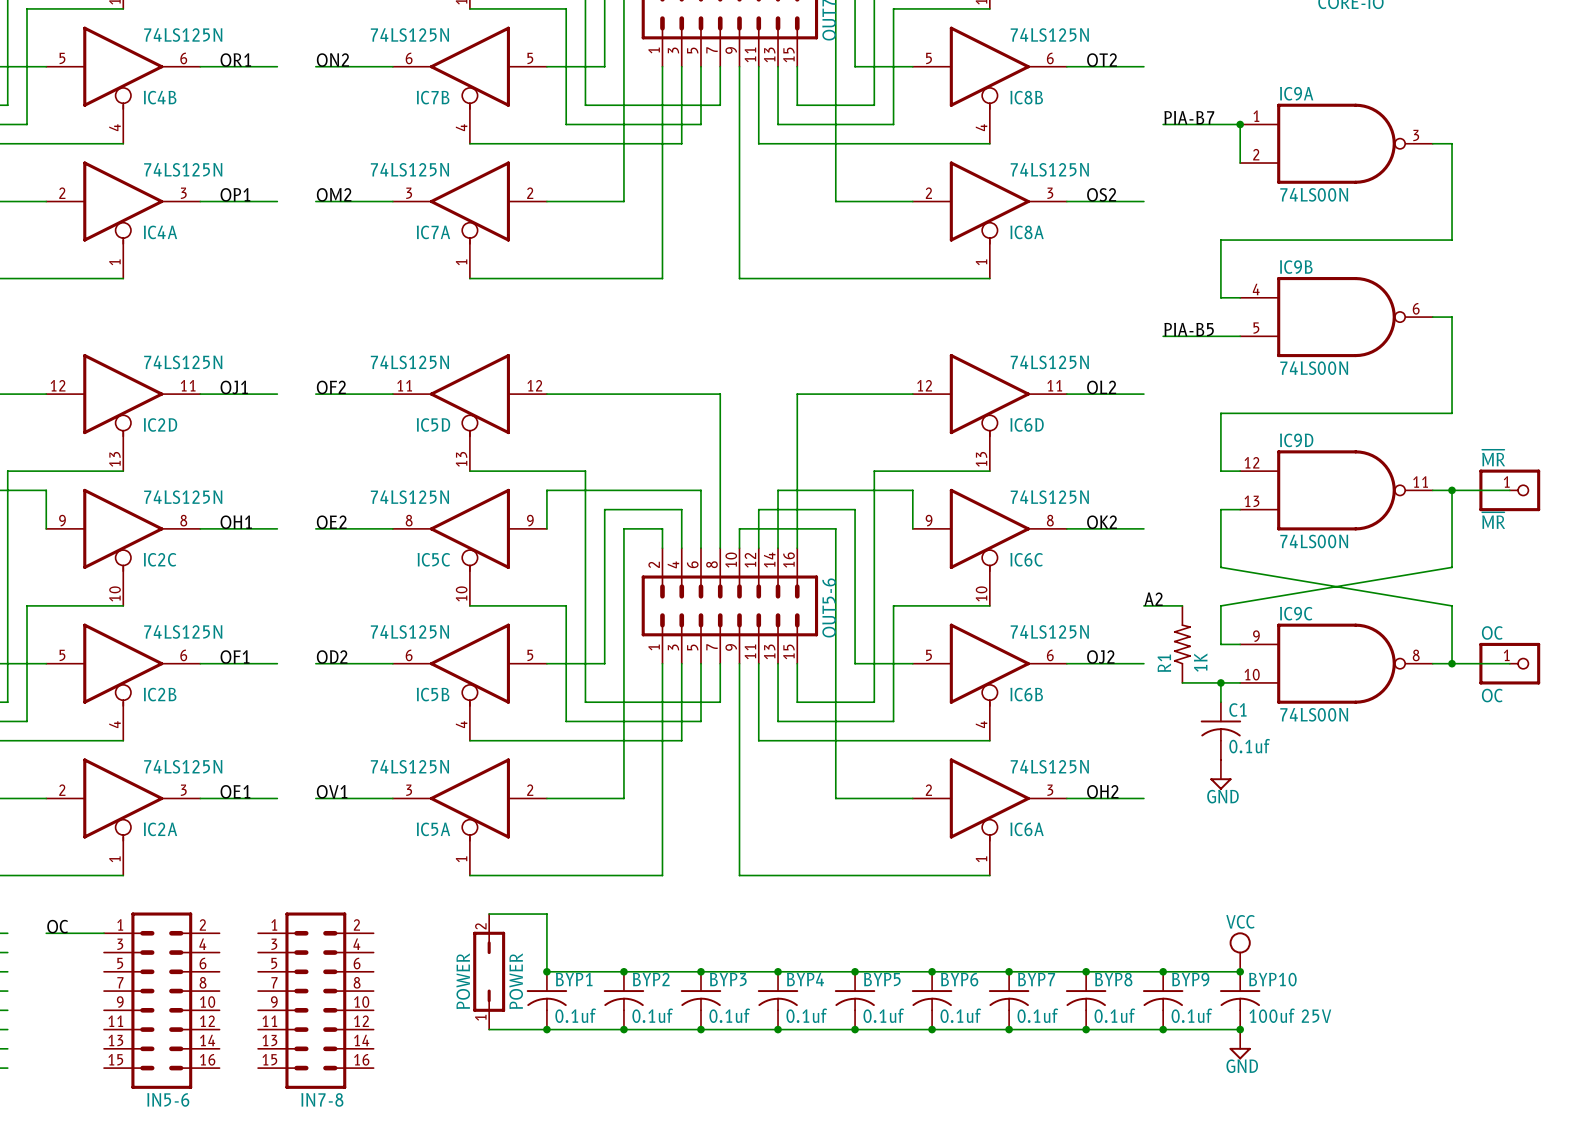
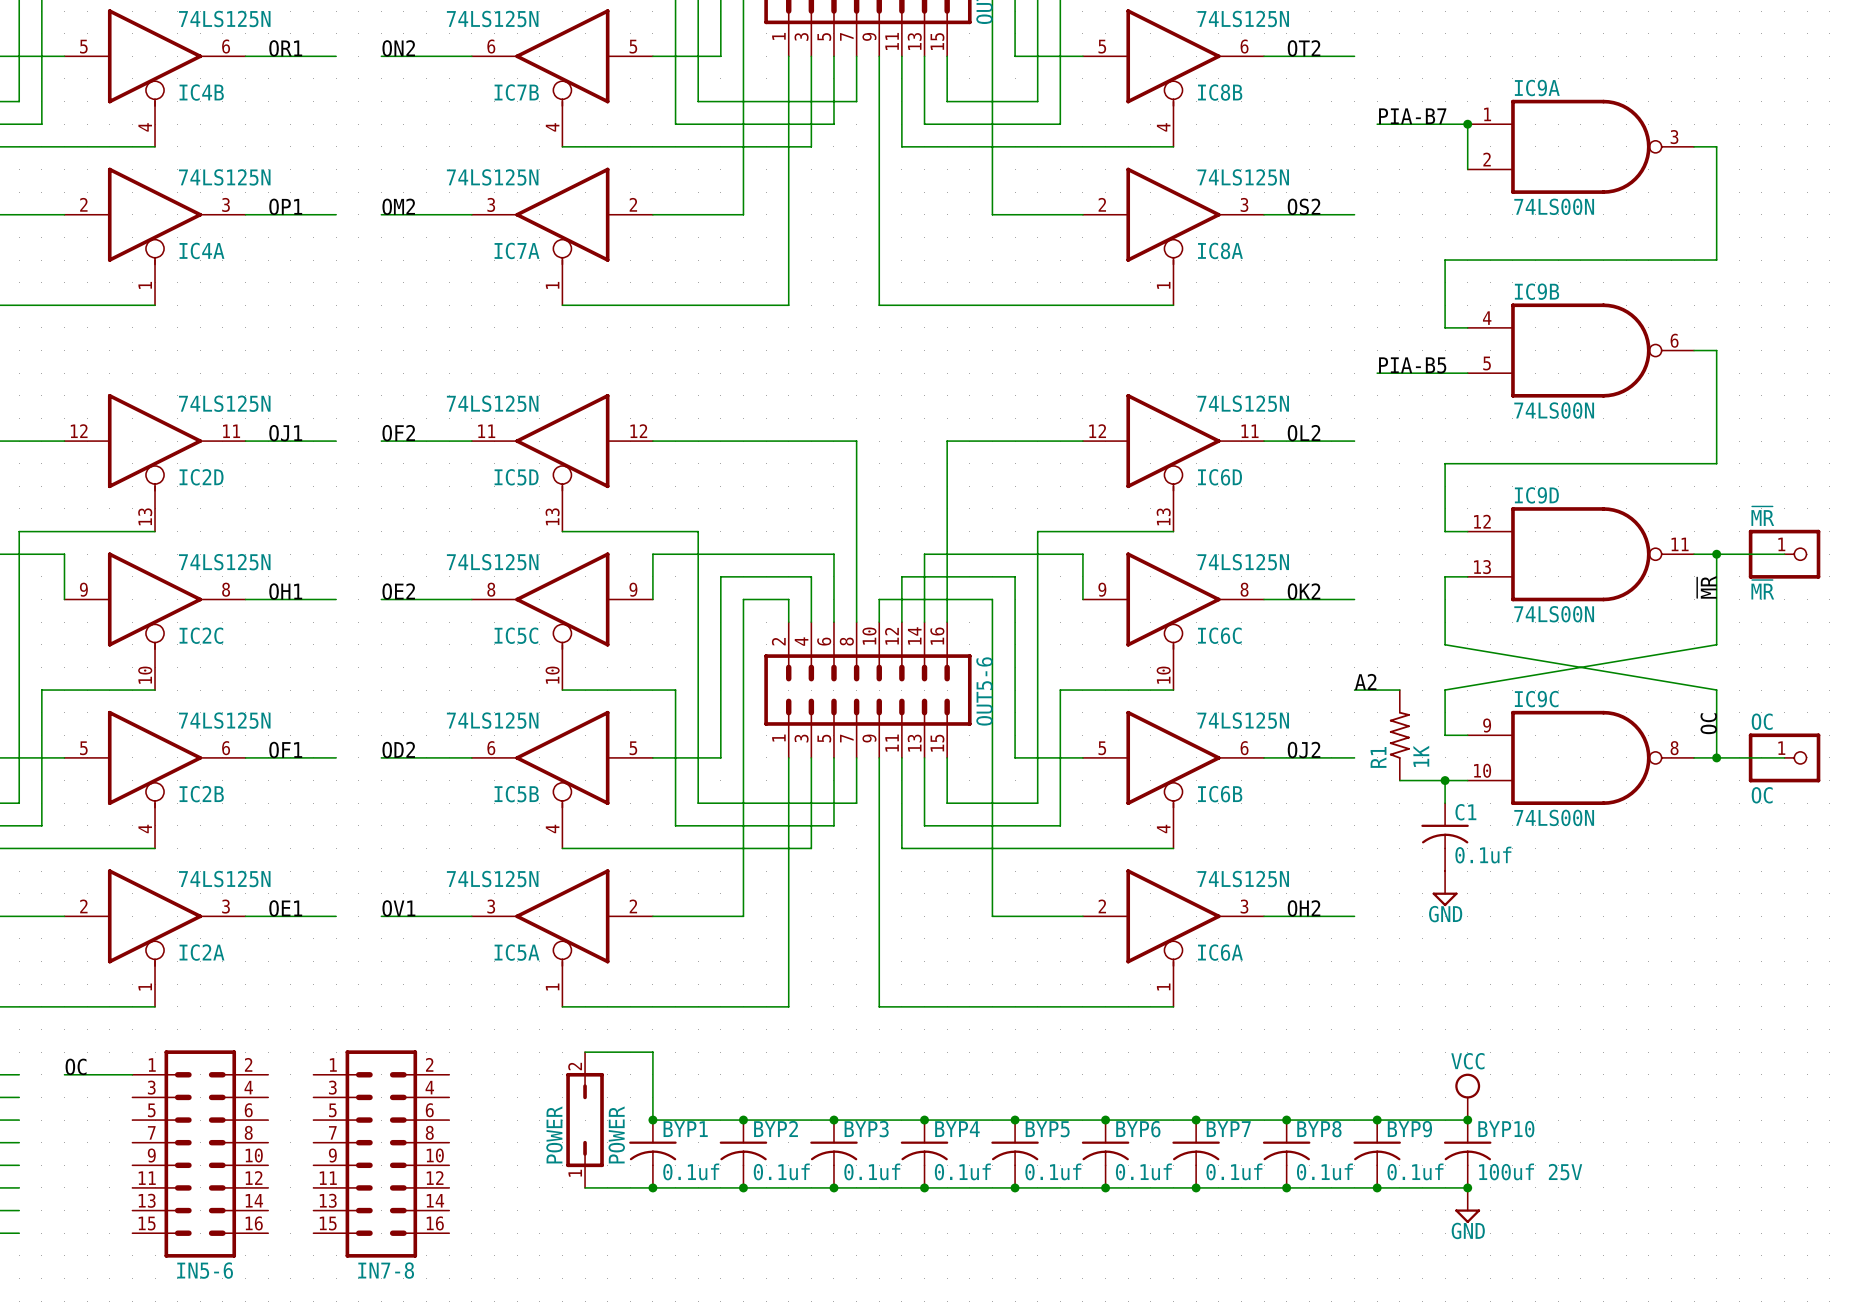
label: none -> ~{MR} (1706, 587)
label: none -> OC (1708, 723)

